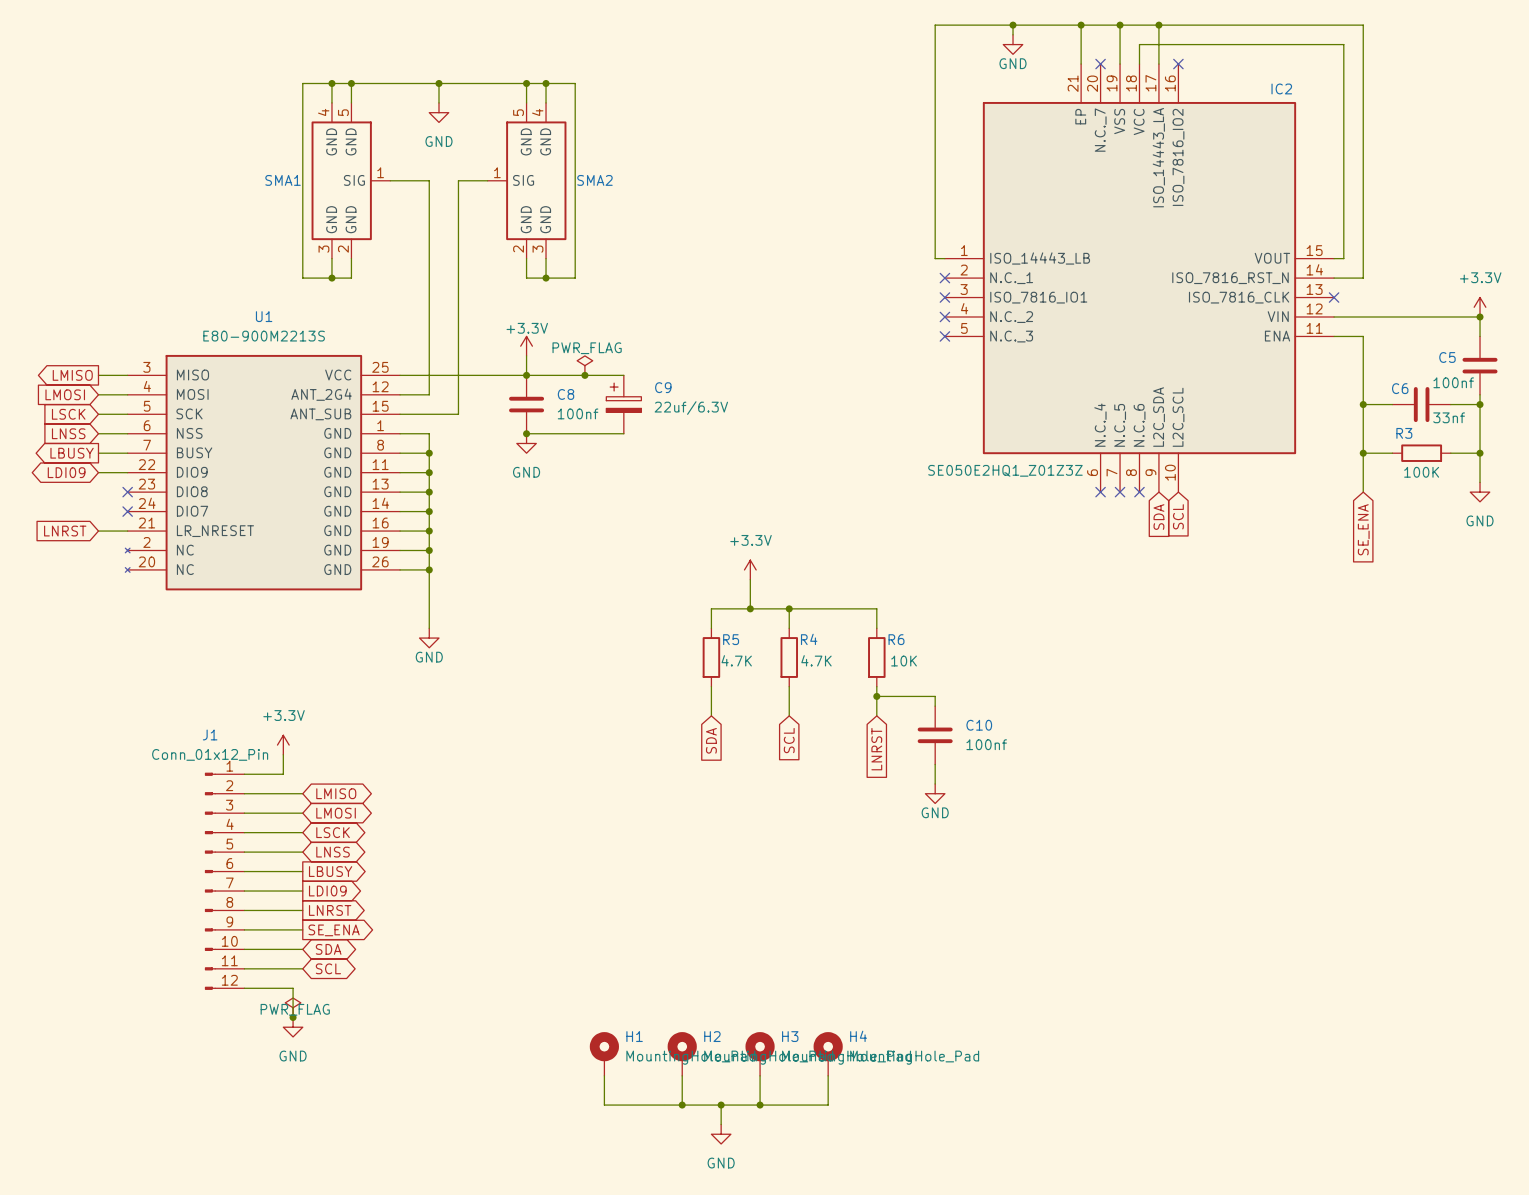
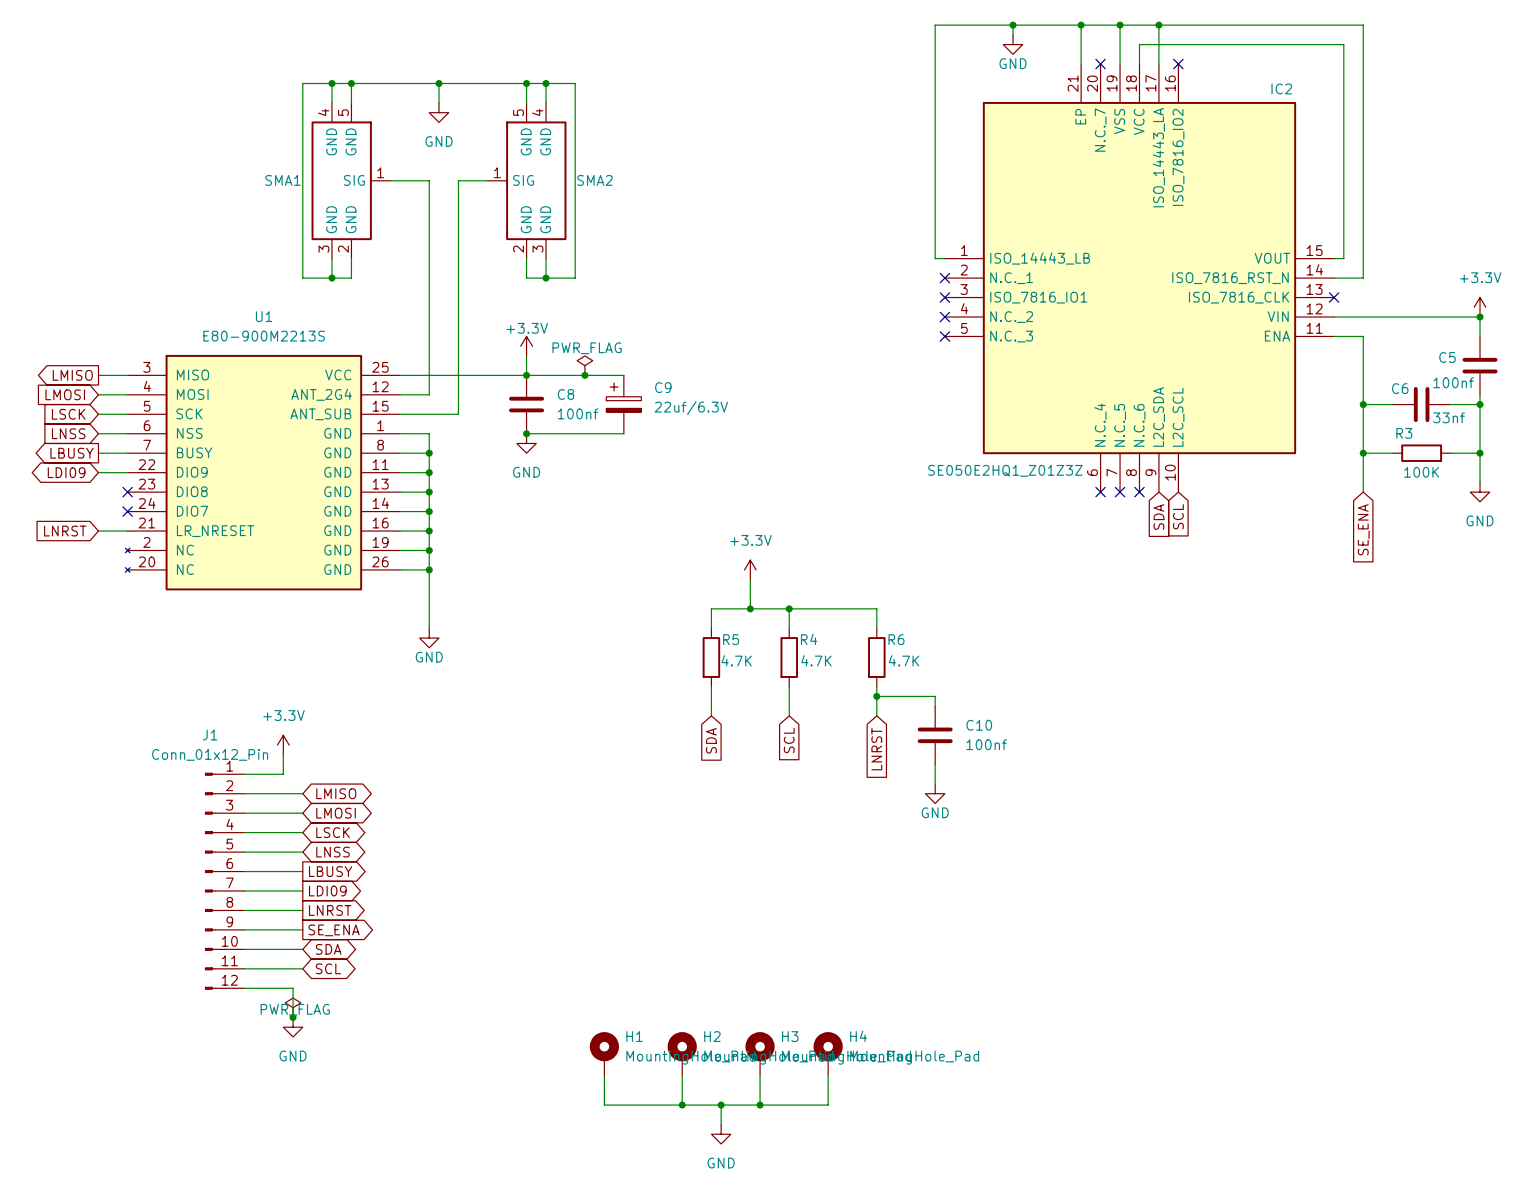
R6 value: 10K (904, 661) -> 4.7K (904, 660)

